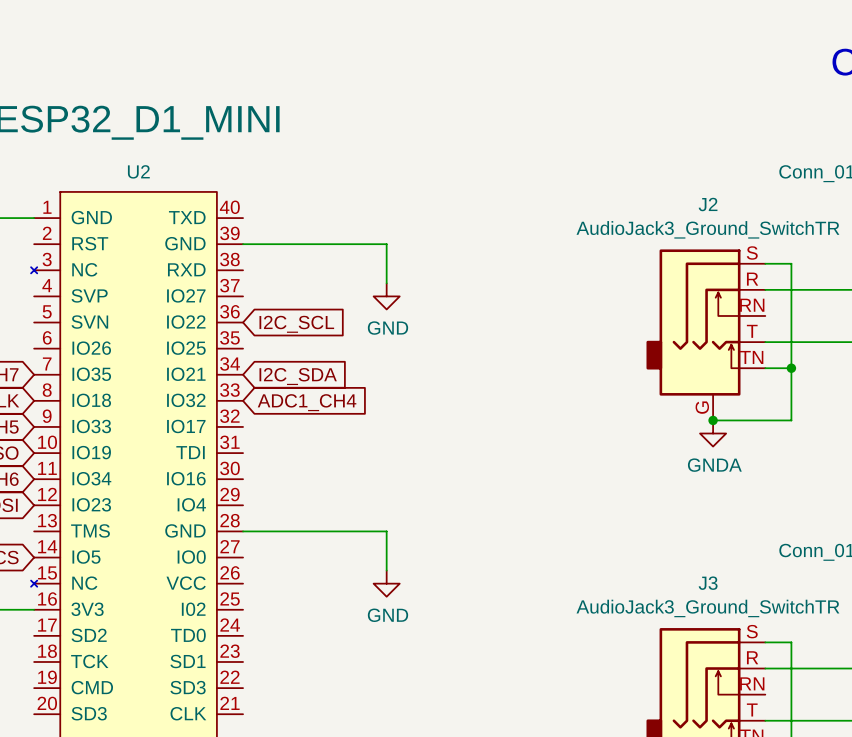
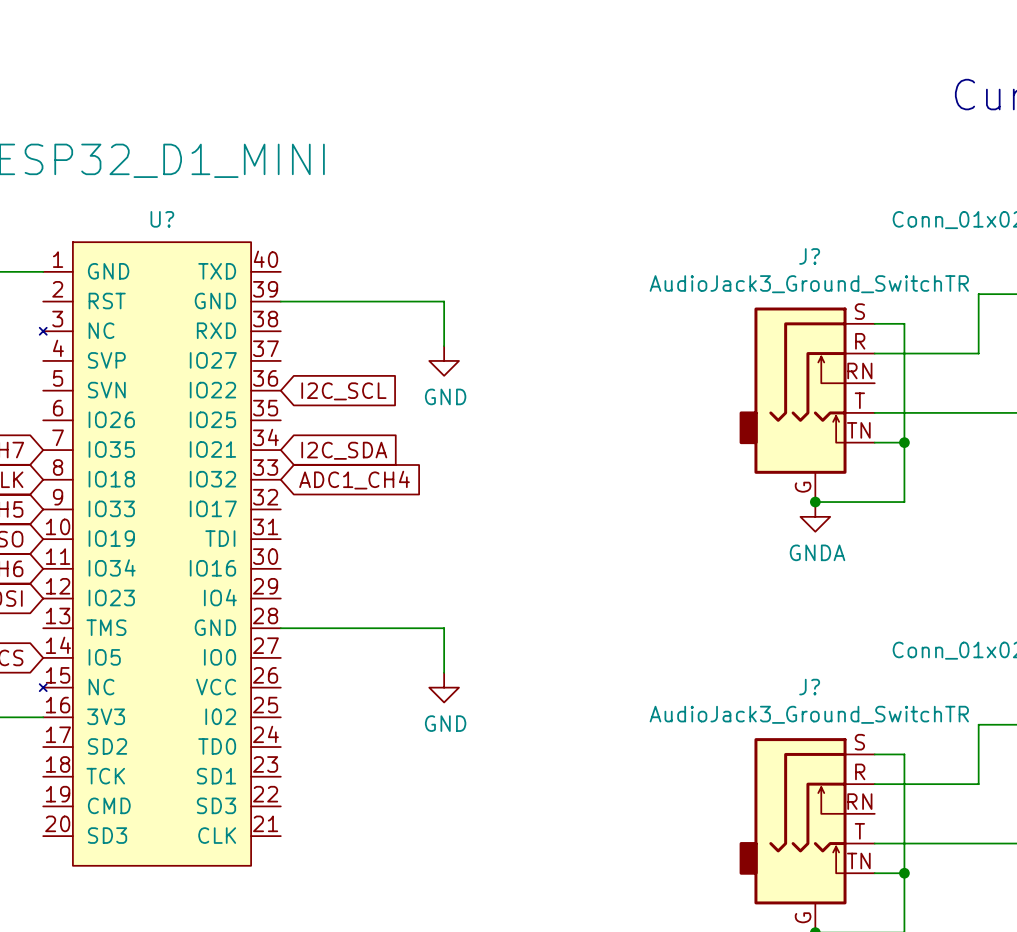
U2 name: U2 (138, 171) -> U? (162, 219)
J2 name: J2 (708, 204) -> J? (809, 256)
J3 name: J3 (708, 583) -> J? (809, 687)

